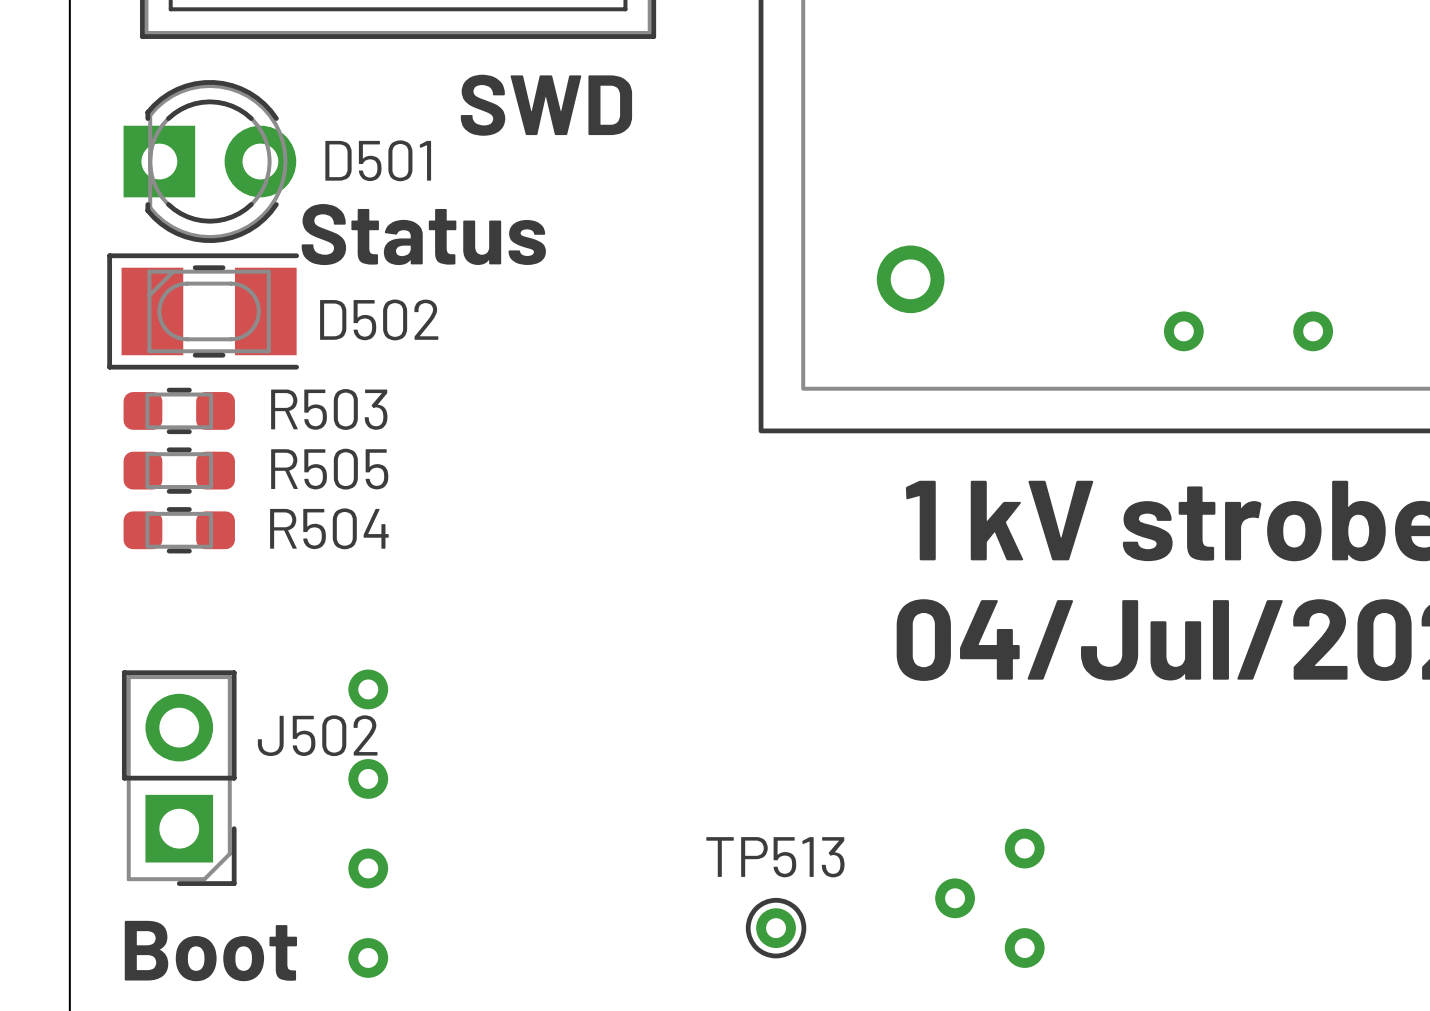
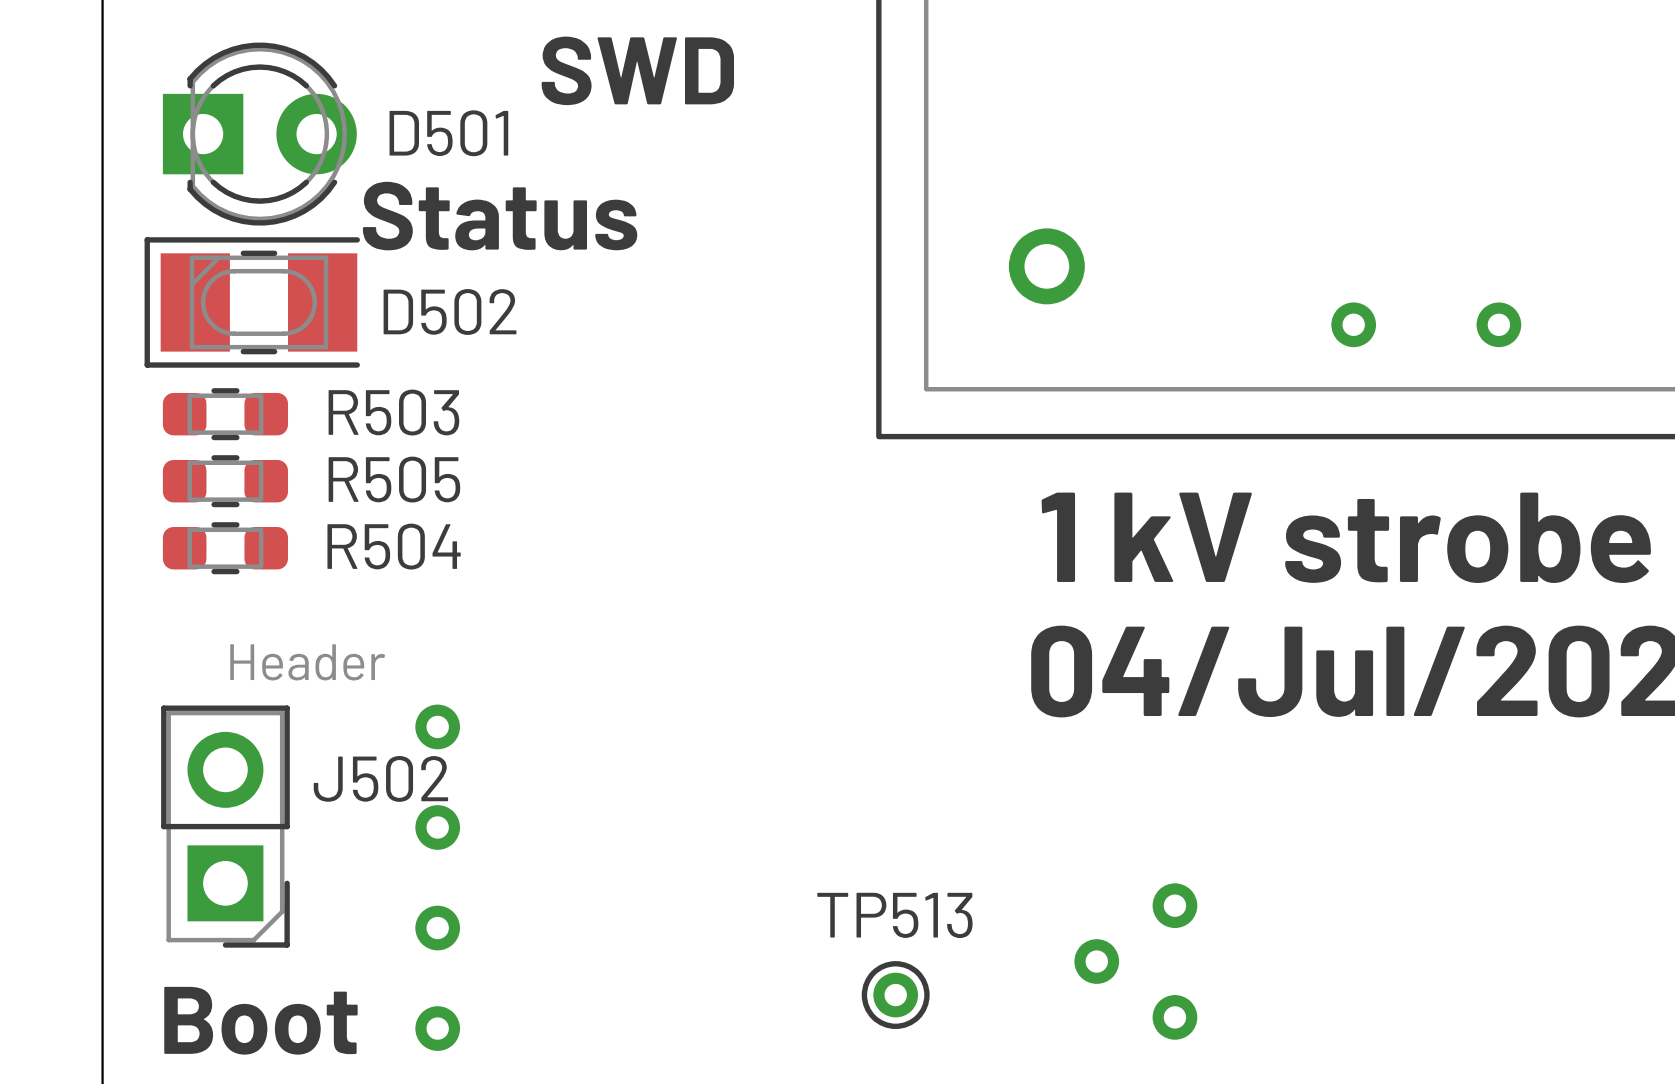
J502 value: none -> Header (307, 662)

